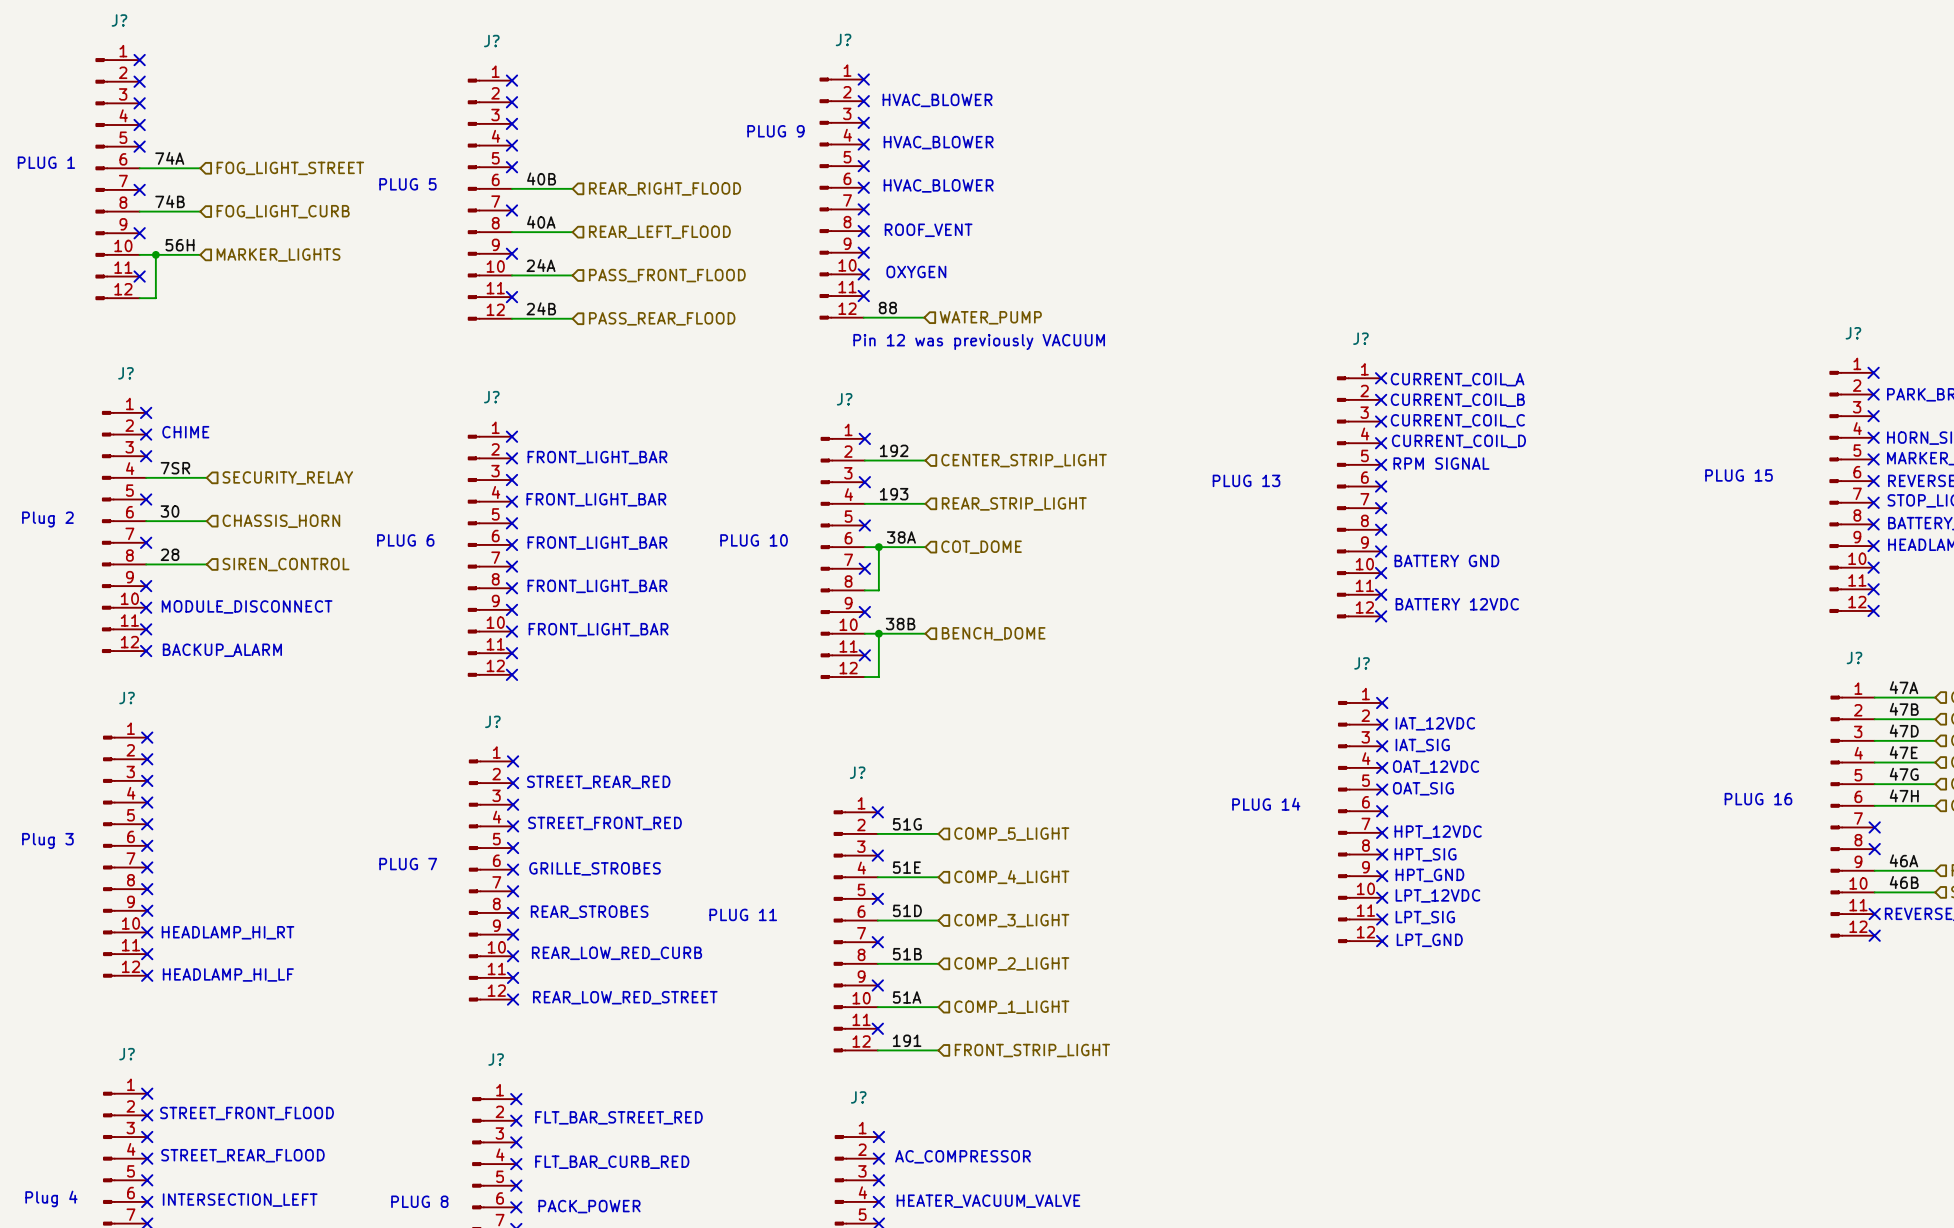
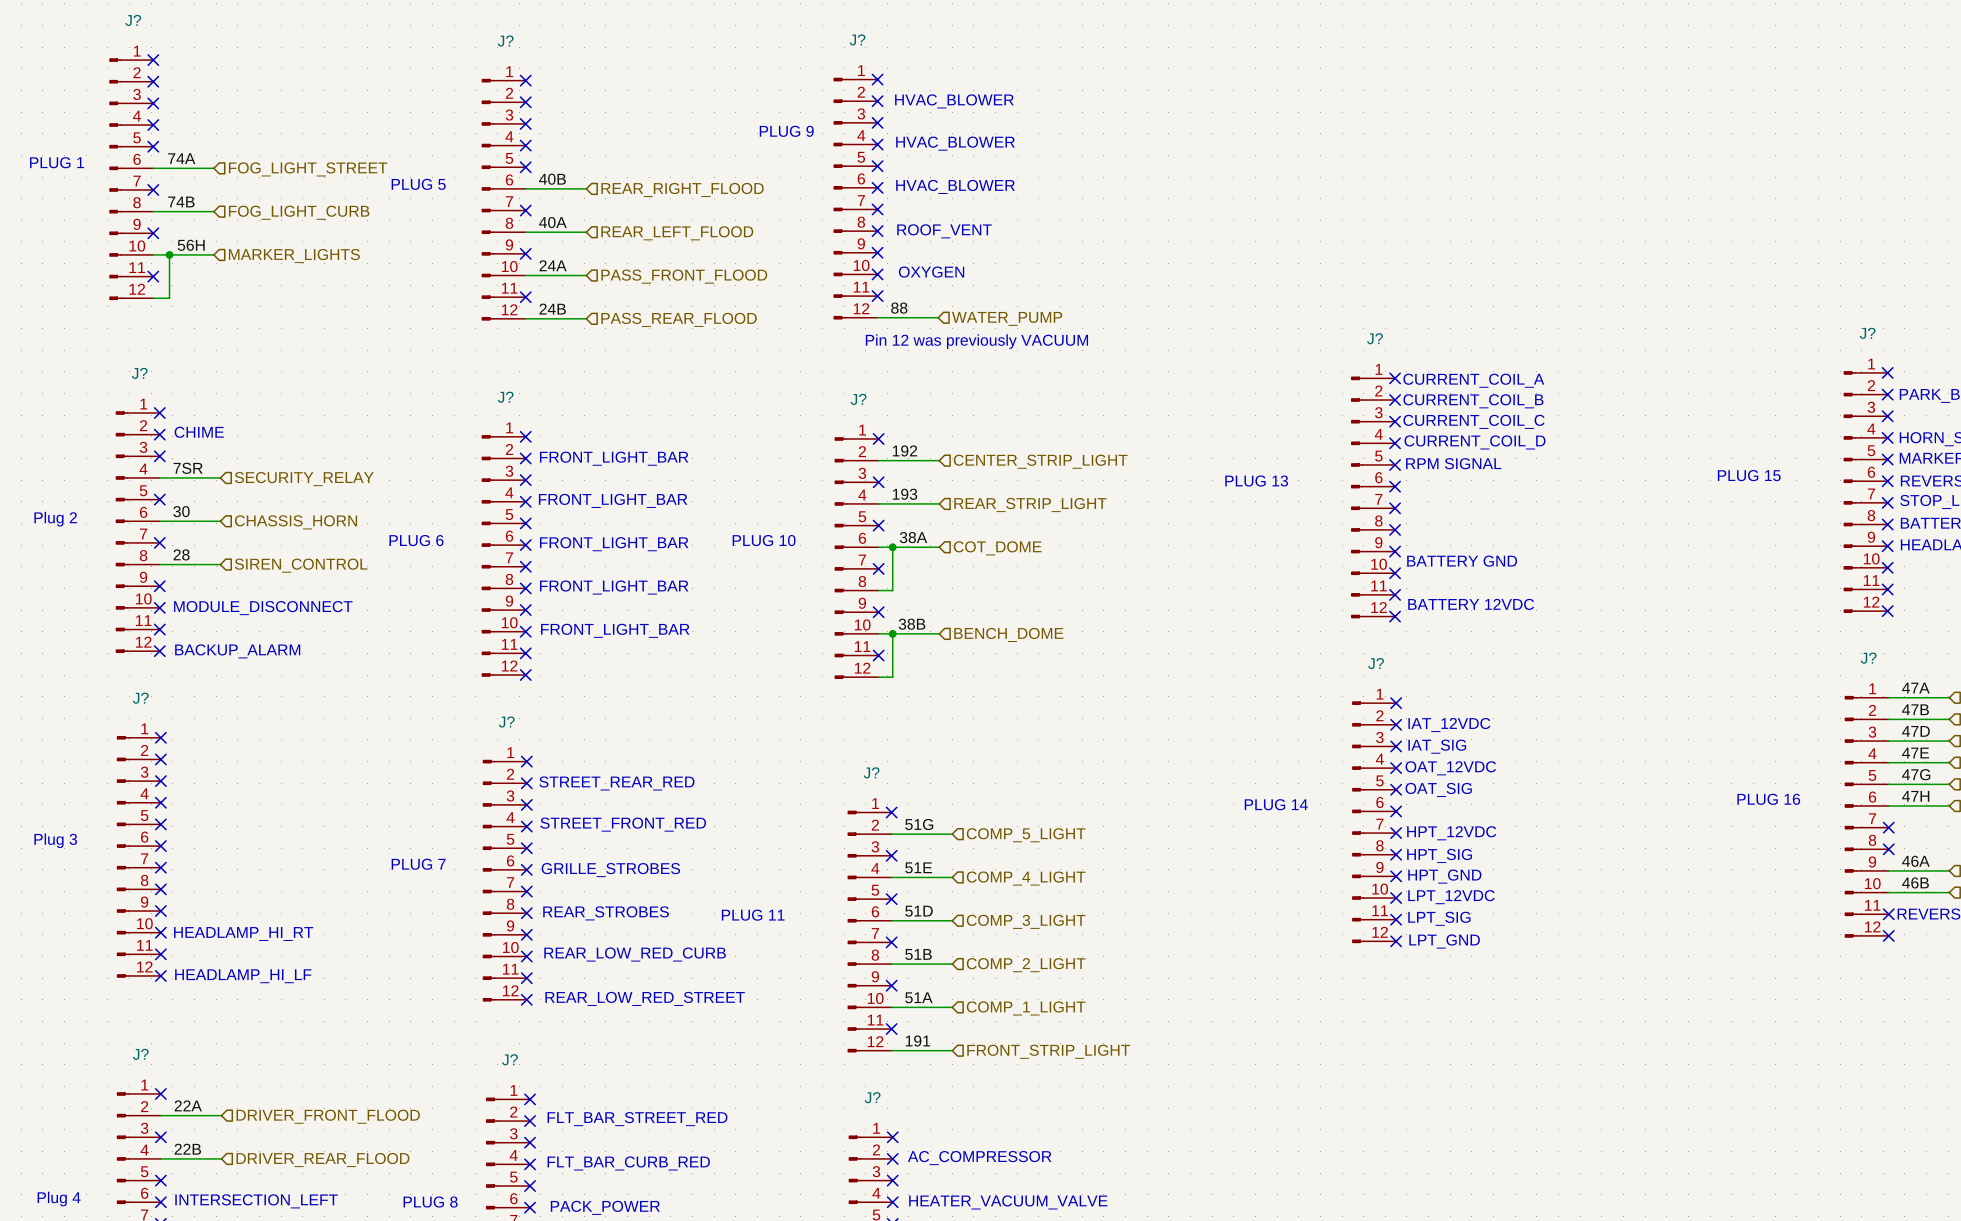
label: none -> 22A (188, 1105)
text: STREET_FRONT_FLOOD (247, 1113) -> none
wire: none -> (160, 1115) (221, 1115)
no-connect mark: (147, 1115) -> none
hierarchical label: none -> DRIVER_FRONT_FLOOD (328, 1116)
label: none -> 22B (187, 1149)
text: STREET_REAR_FLOOD (242, 1155) -> none
wire: none -> (160, 1158) (221, 1158)
no-connect mark: (147, 1158) -> none
hierarchical label: none -> DRIVER_REAR_FLOOD (322, 1160)

